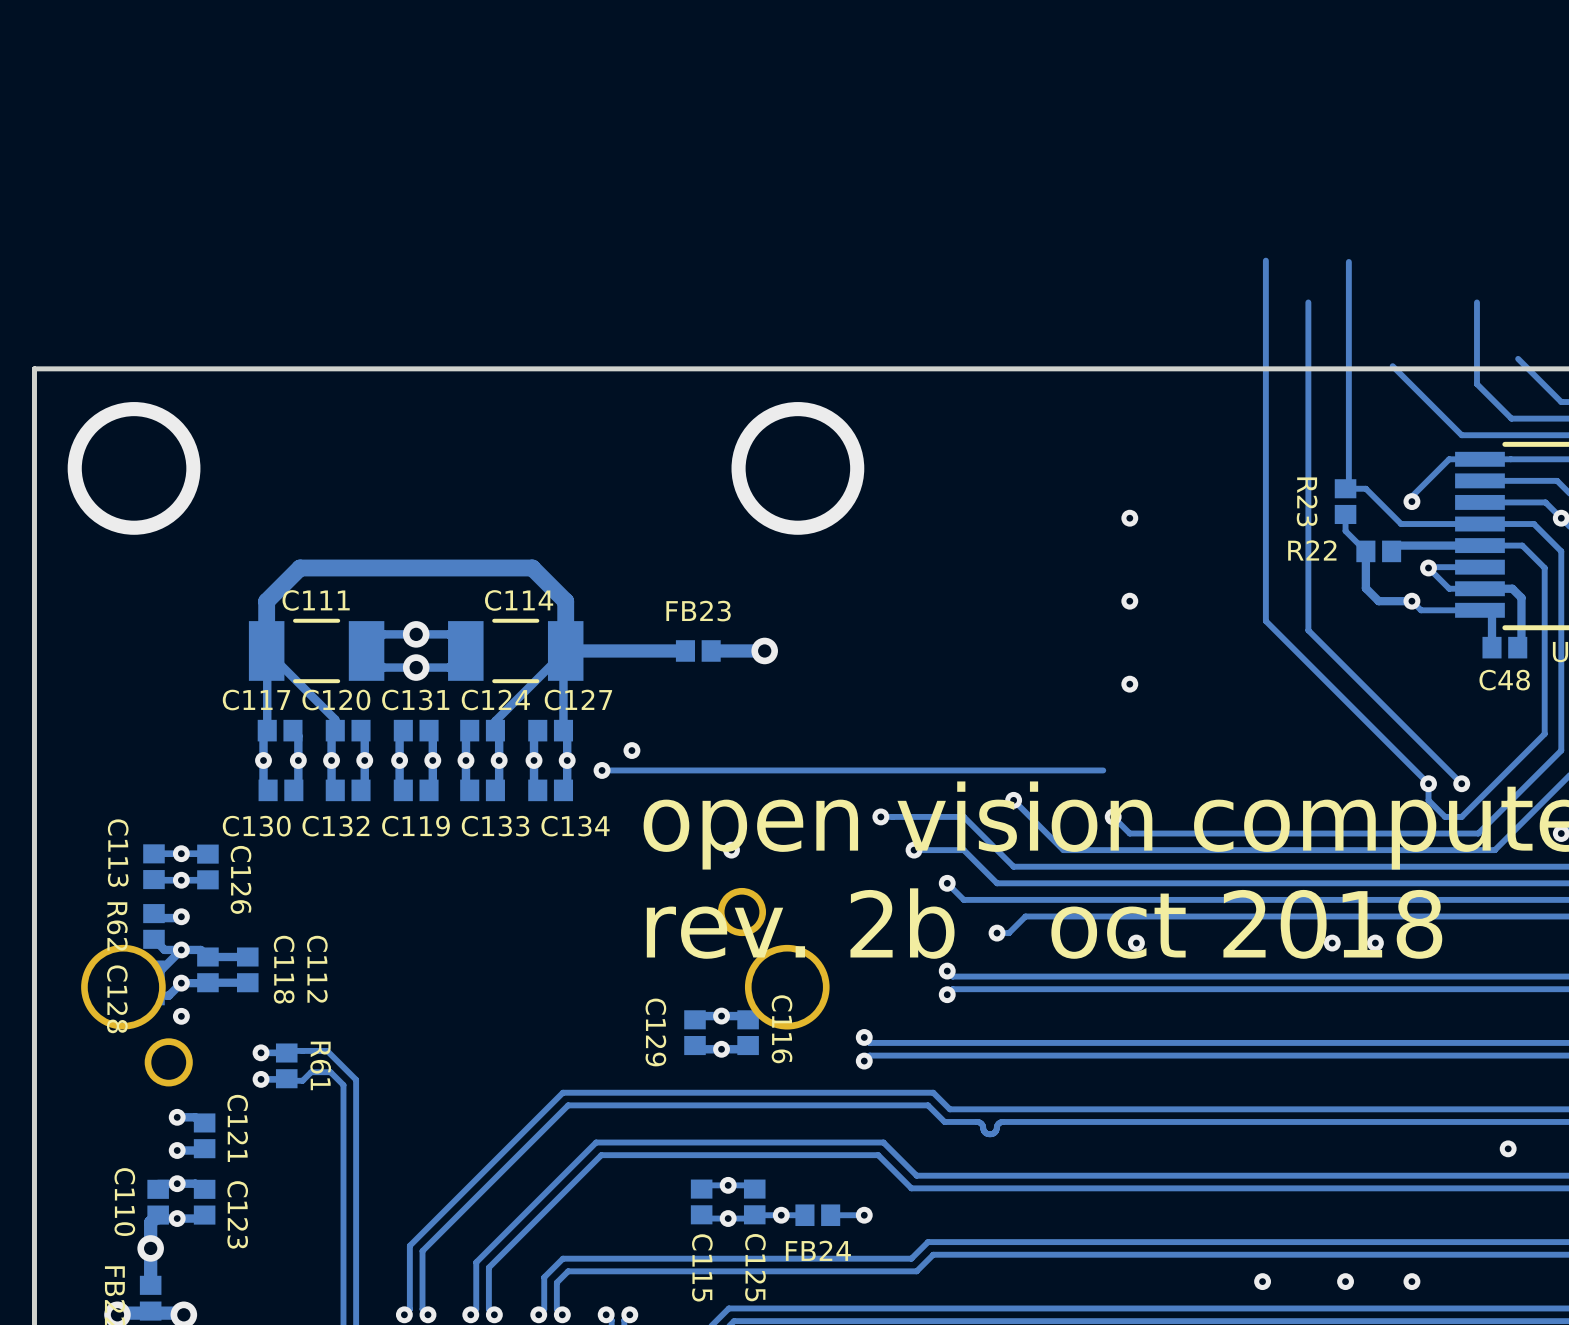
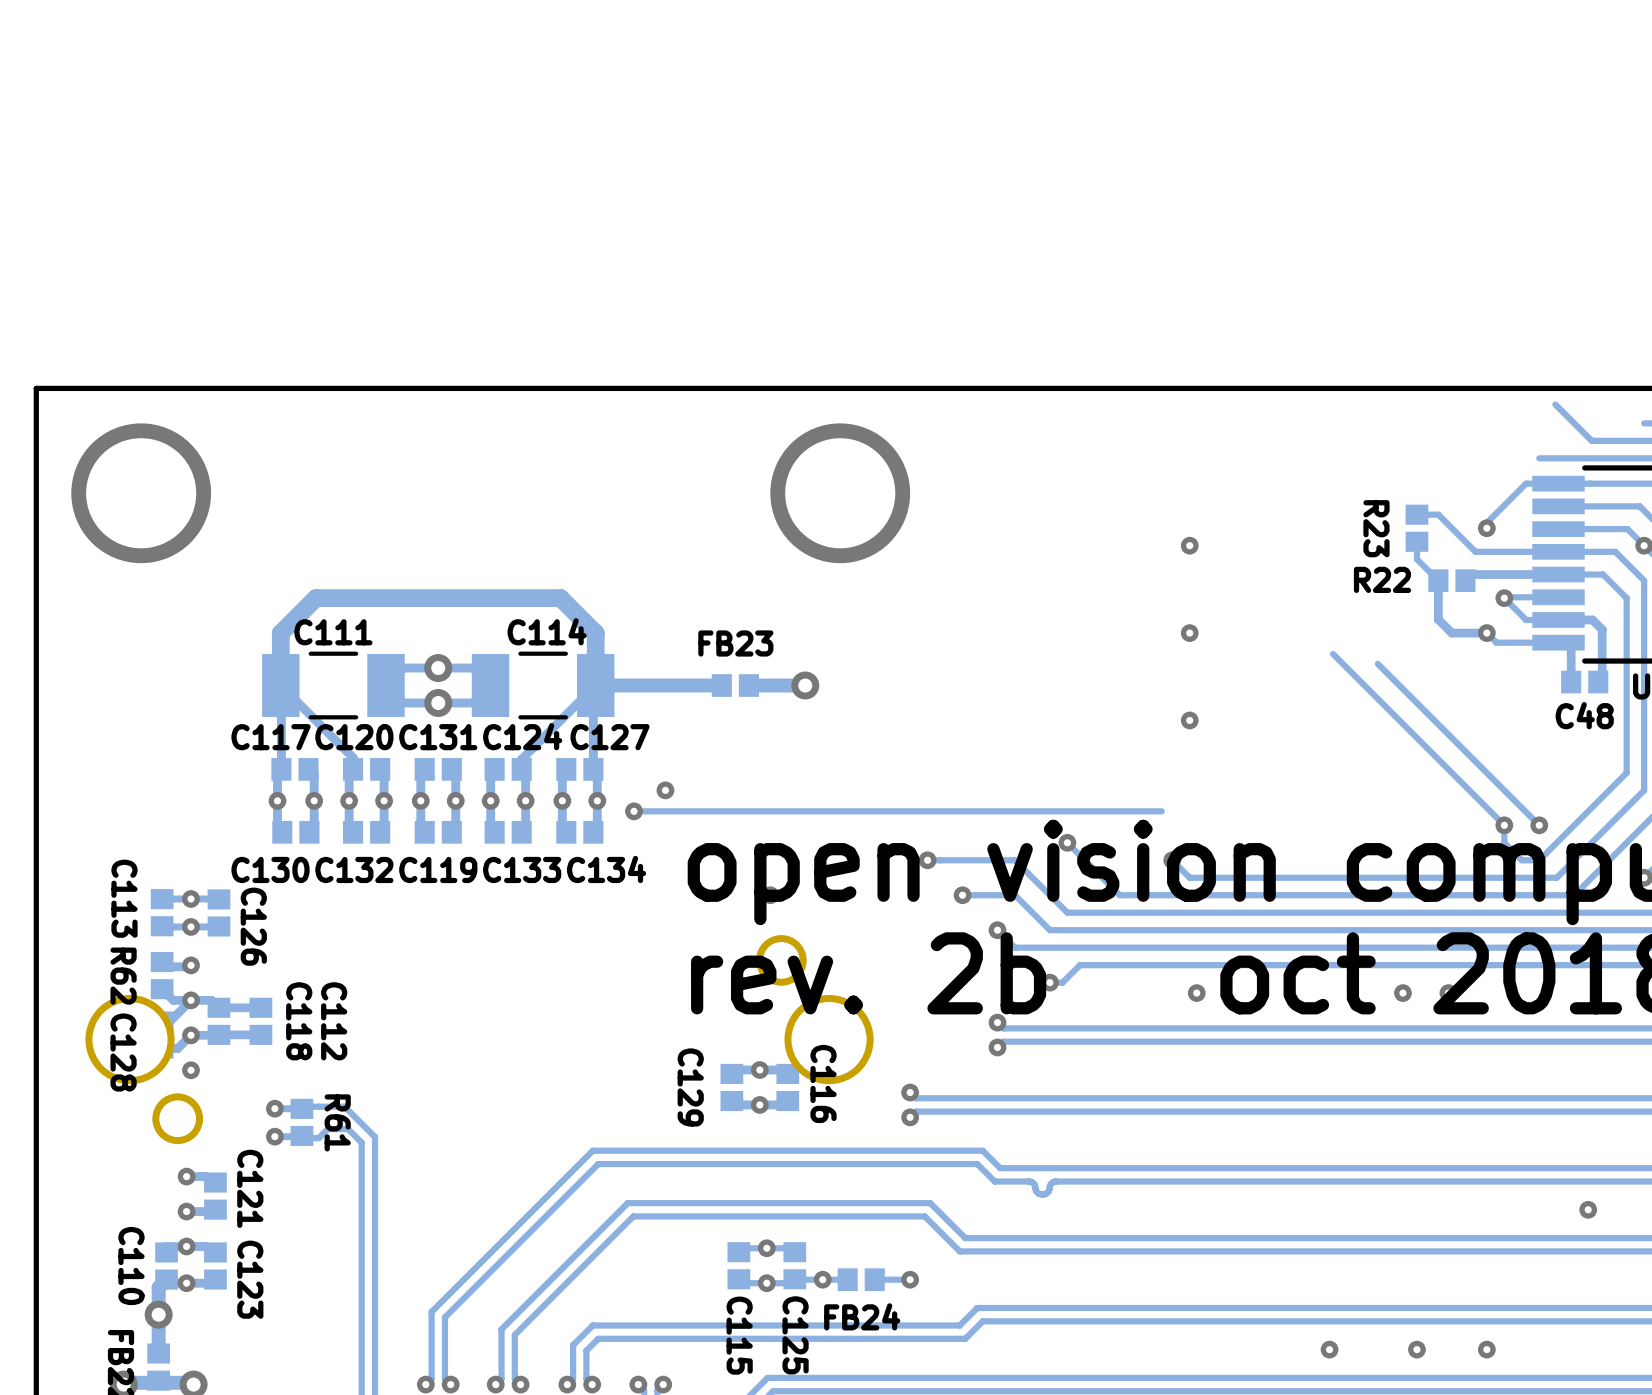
track: (1265, 260) (1265, 621) -> none
track: (1348, 261) (1348, 485) -> none
track: (1308, 302) (1308, 630) -> none
track: (1476, 302) (1476, 384) -> none
track: (1518, 358) (1561, 402) -> none
track: (1392, 366) (1461, 435) -> none

